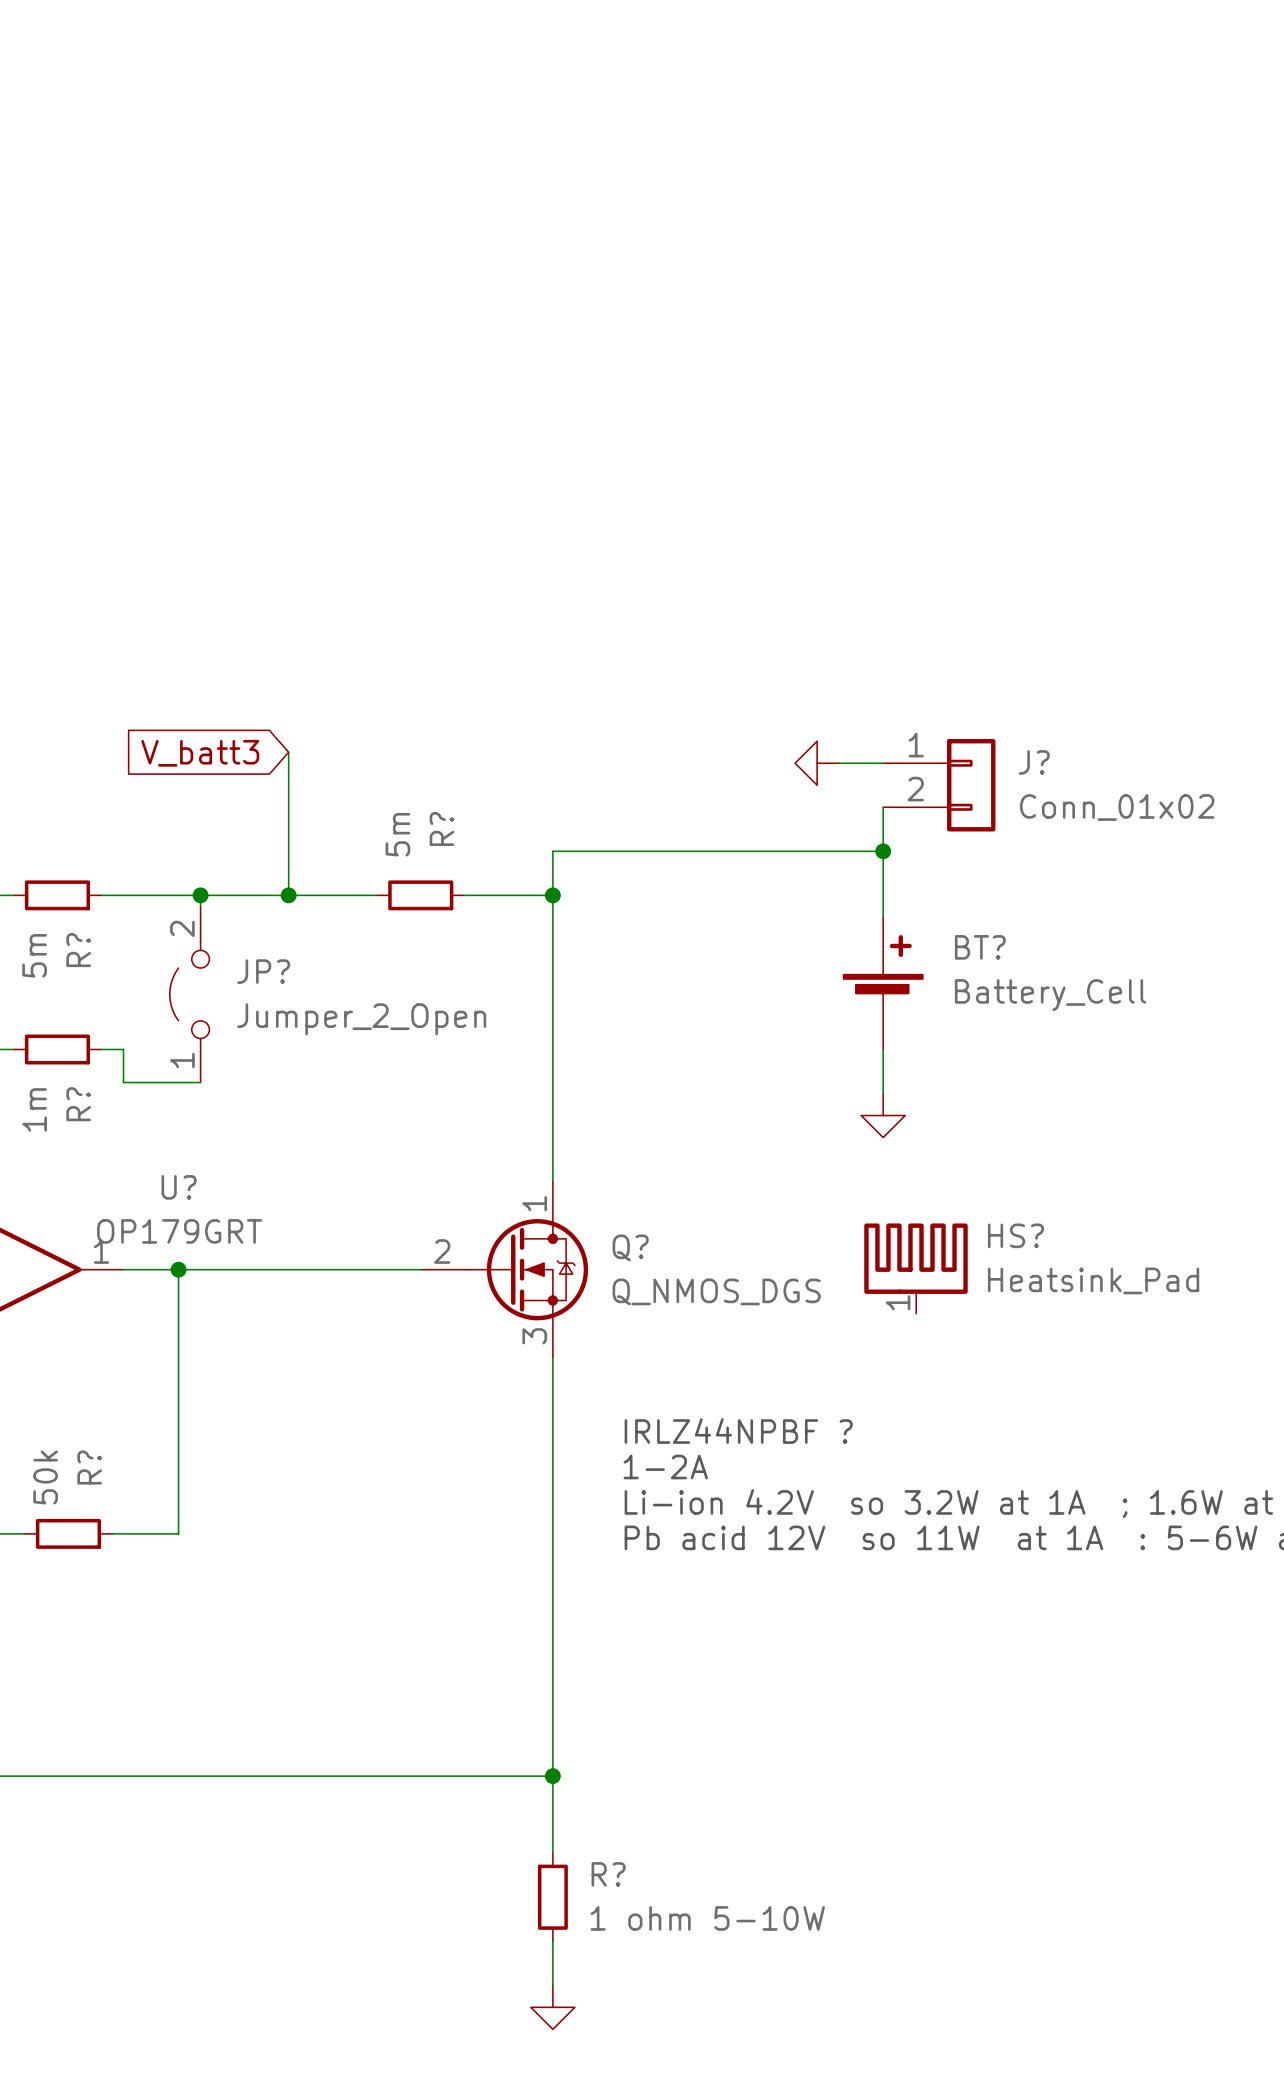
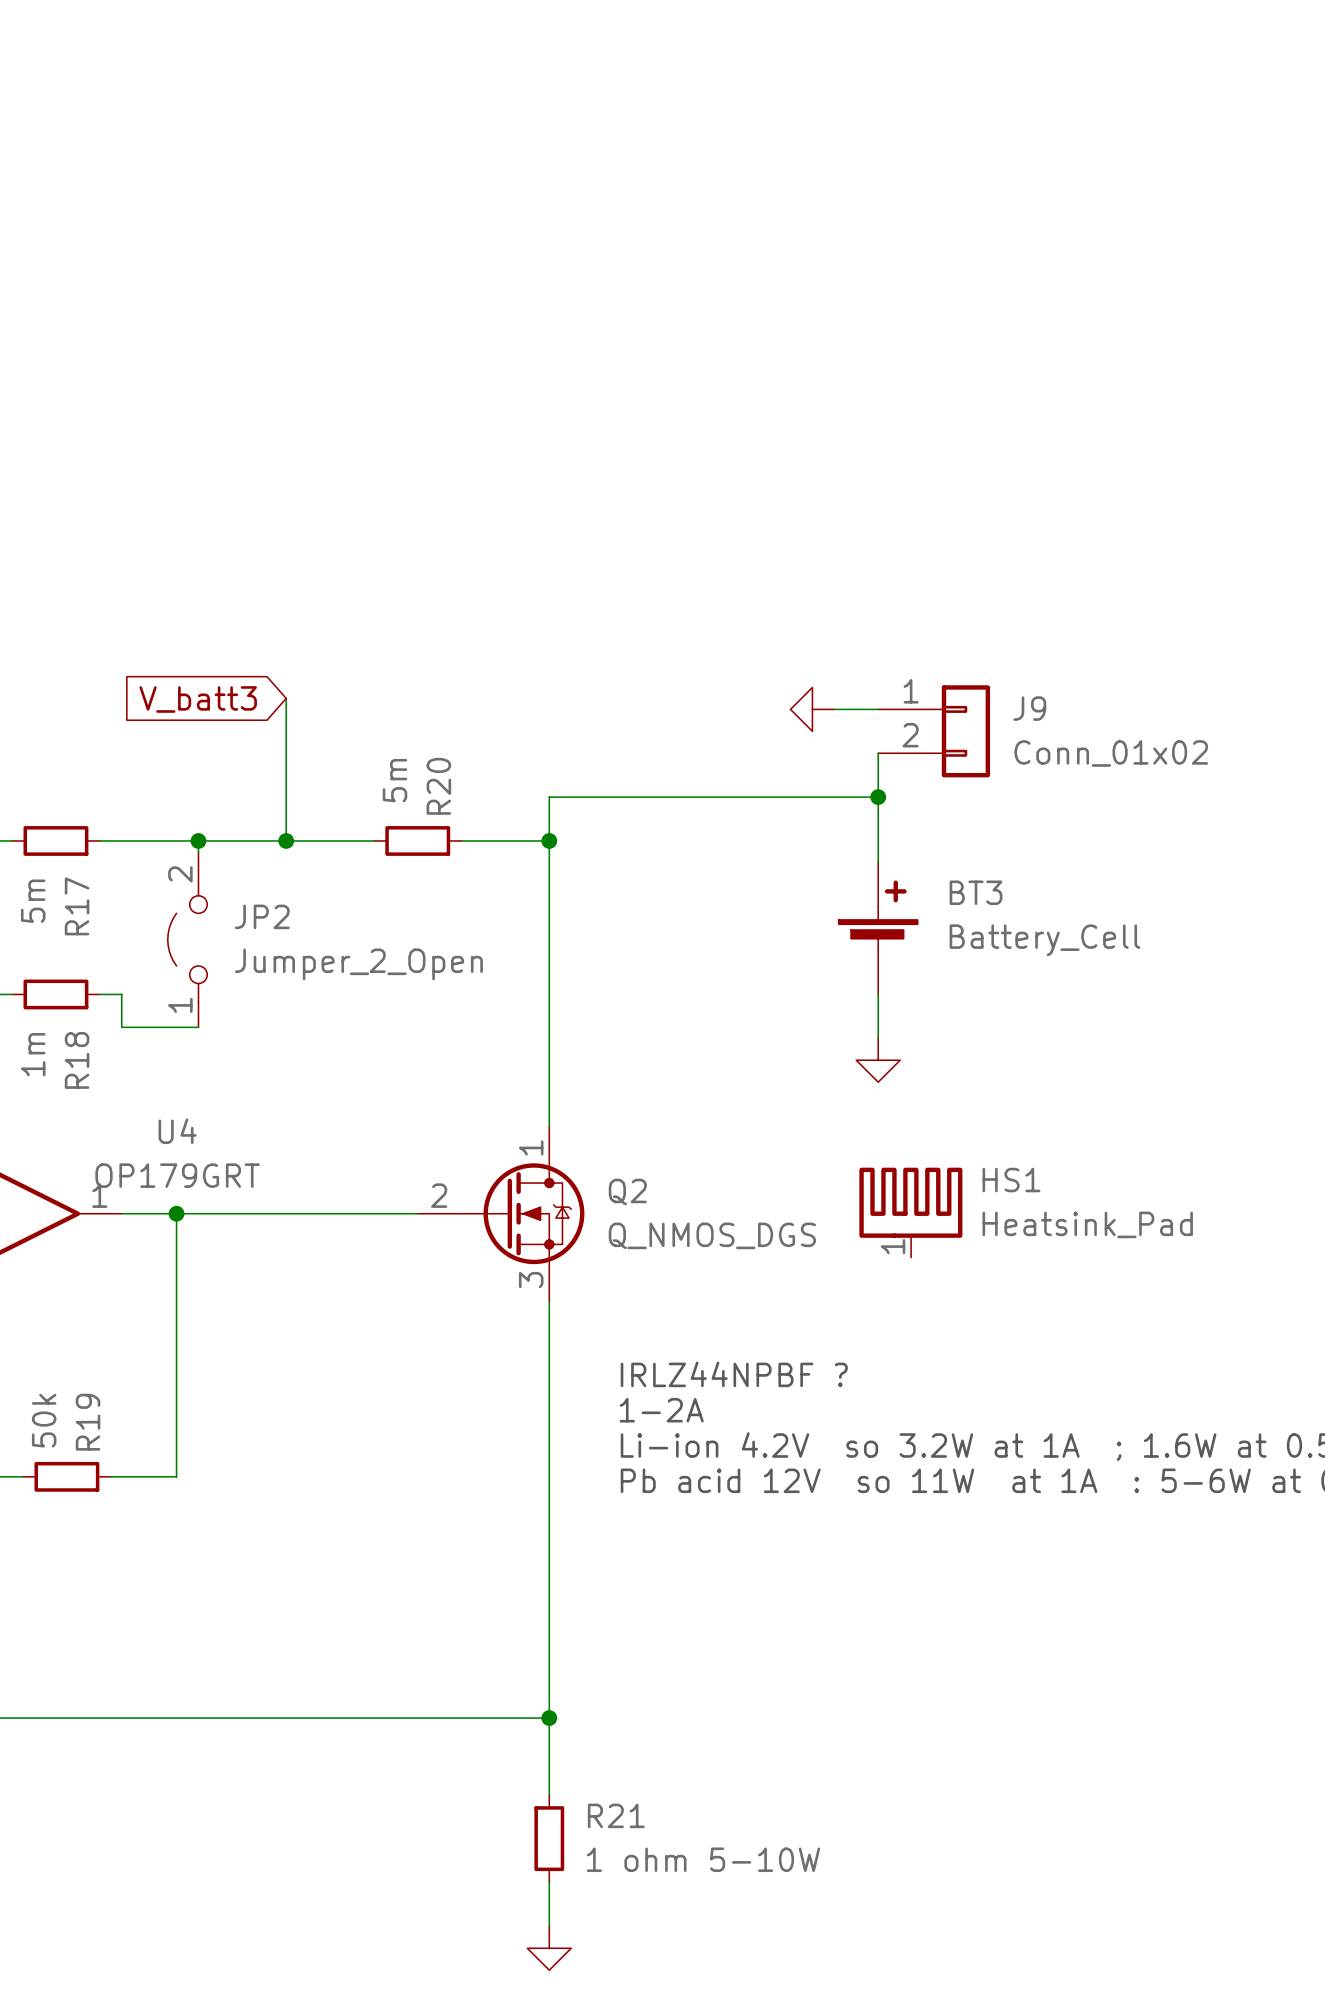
J? name: J? (1034, 762) -> J9 (1029, 708)
R? name: R? (441, 828) -> R20 (438, 786)
BT? name: BT? (980, 947) -> BT3 (976, 892)
R? name: R? (78, 950) -> R17 (77, 906)
JP? name: JP? (263, 971) -> JP2 (262, 916)
R? name: R? (78, 1104) -> R18 (77, 1060)
U? name: U? (179, 1187) -> U4 (177, 1131)
HS? name: HS? (1015, 1235) -> HS1 (1011, 1180)
Q? name: Q? (630, 1247) -> Q2 (627, 1192)
R? name: R? (89, 1467) -> R19 (88, 1422)
R? name: R? (608, 1874) -> R21 (616, 1815)

